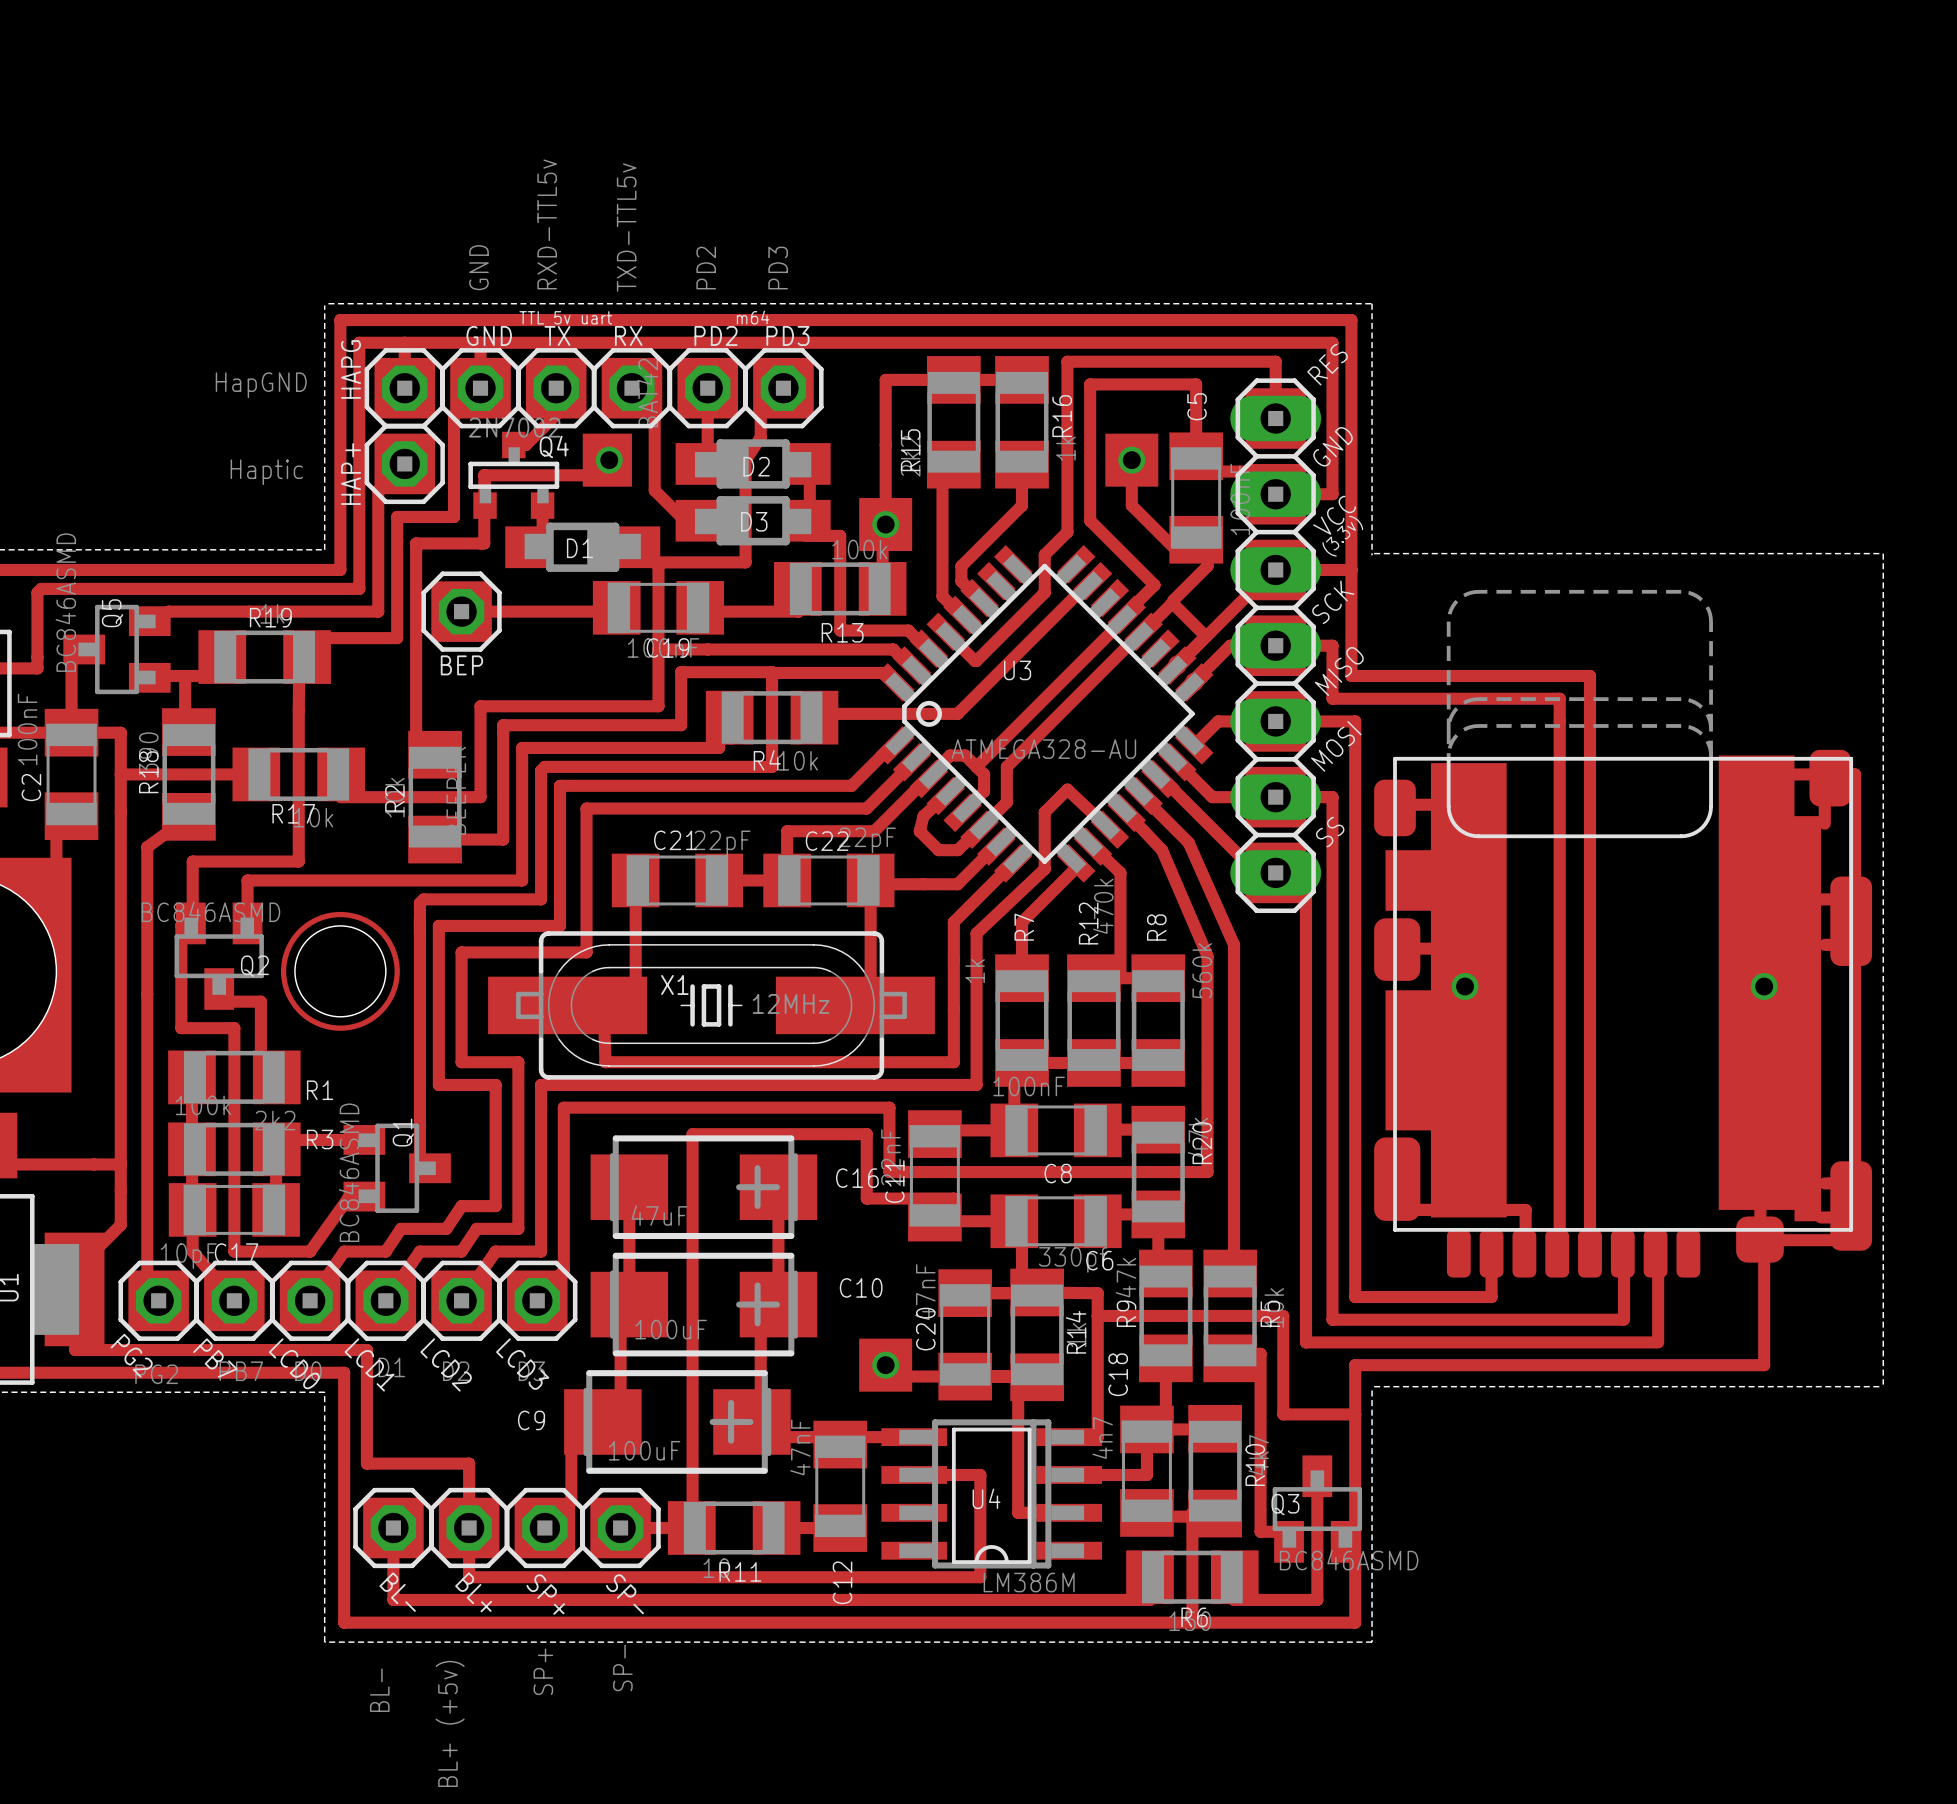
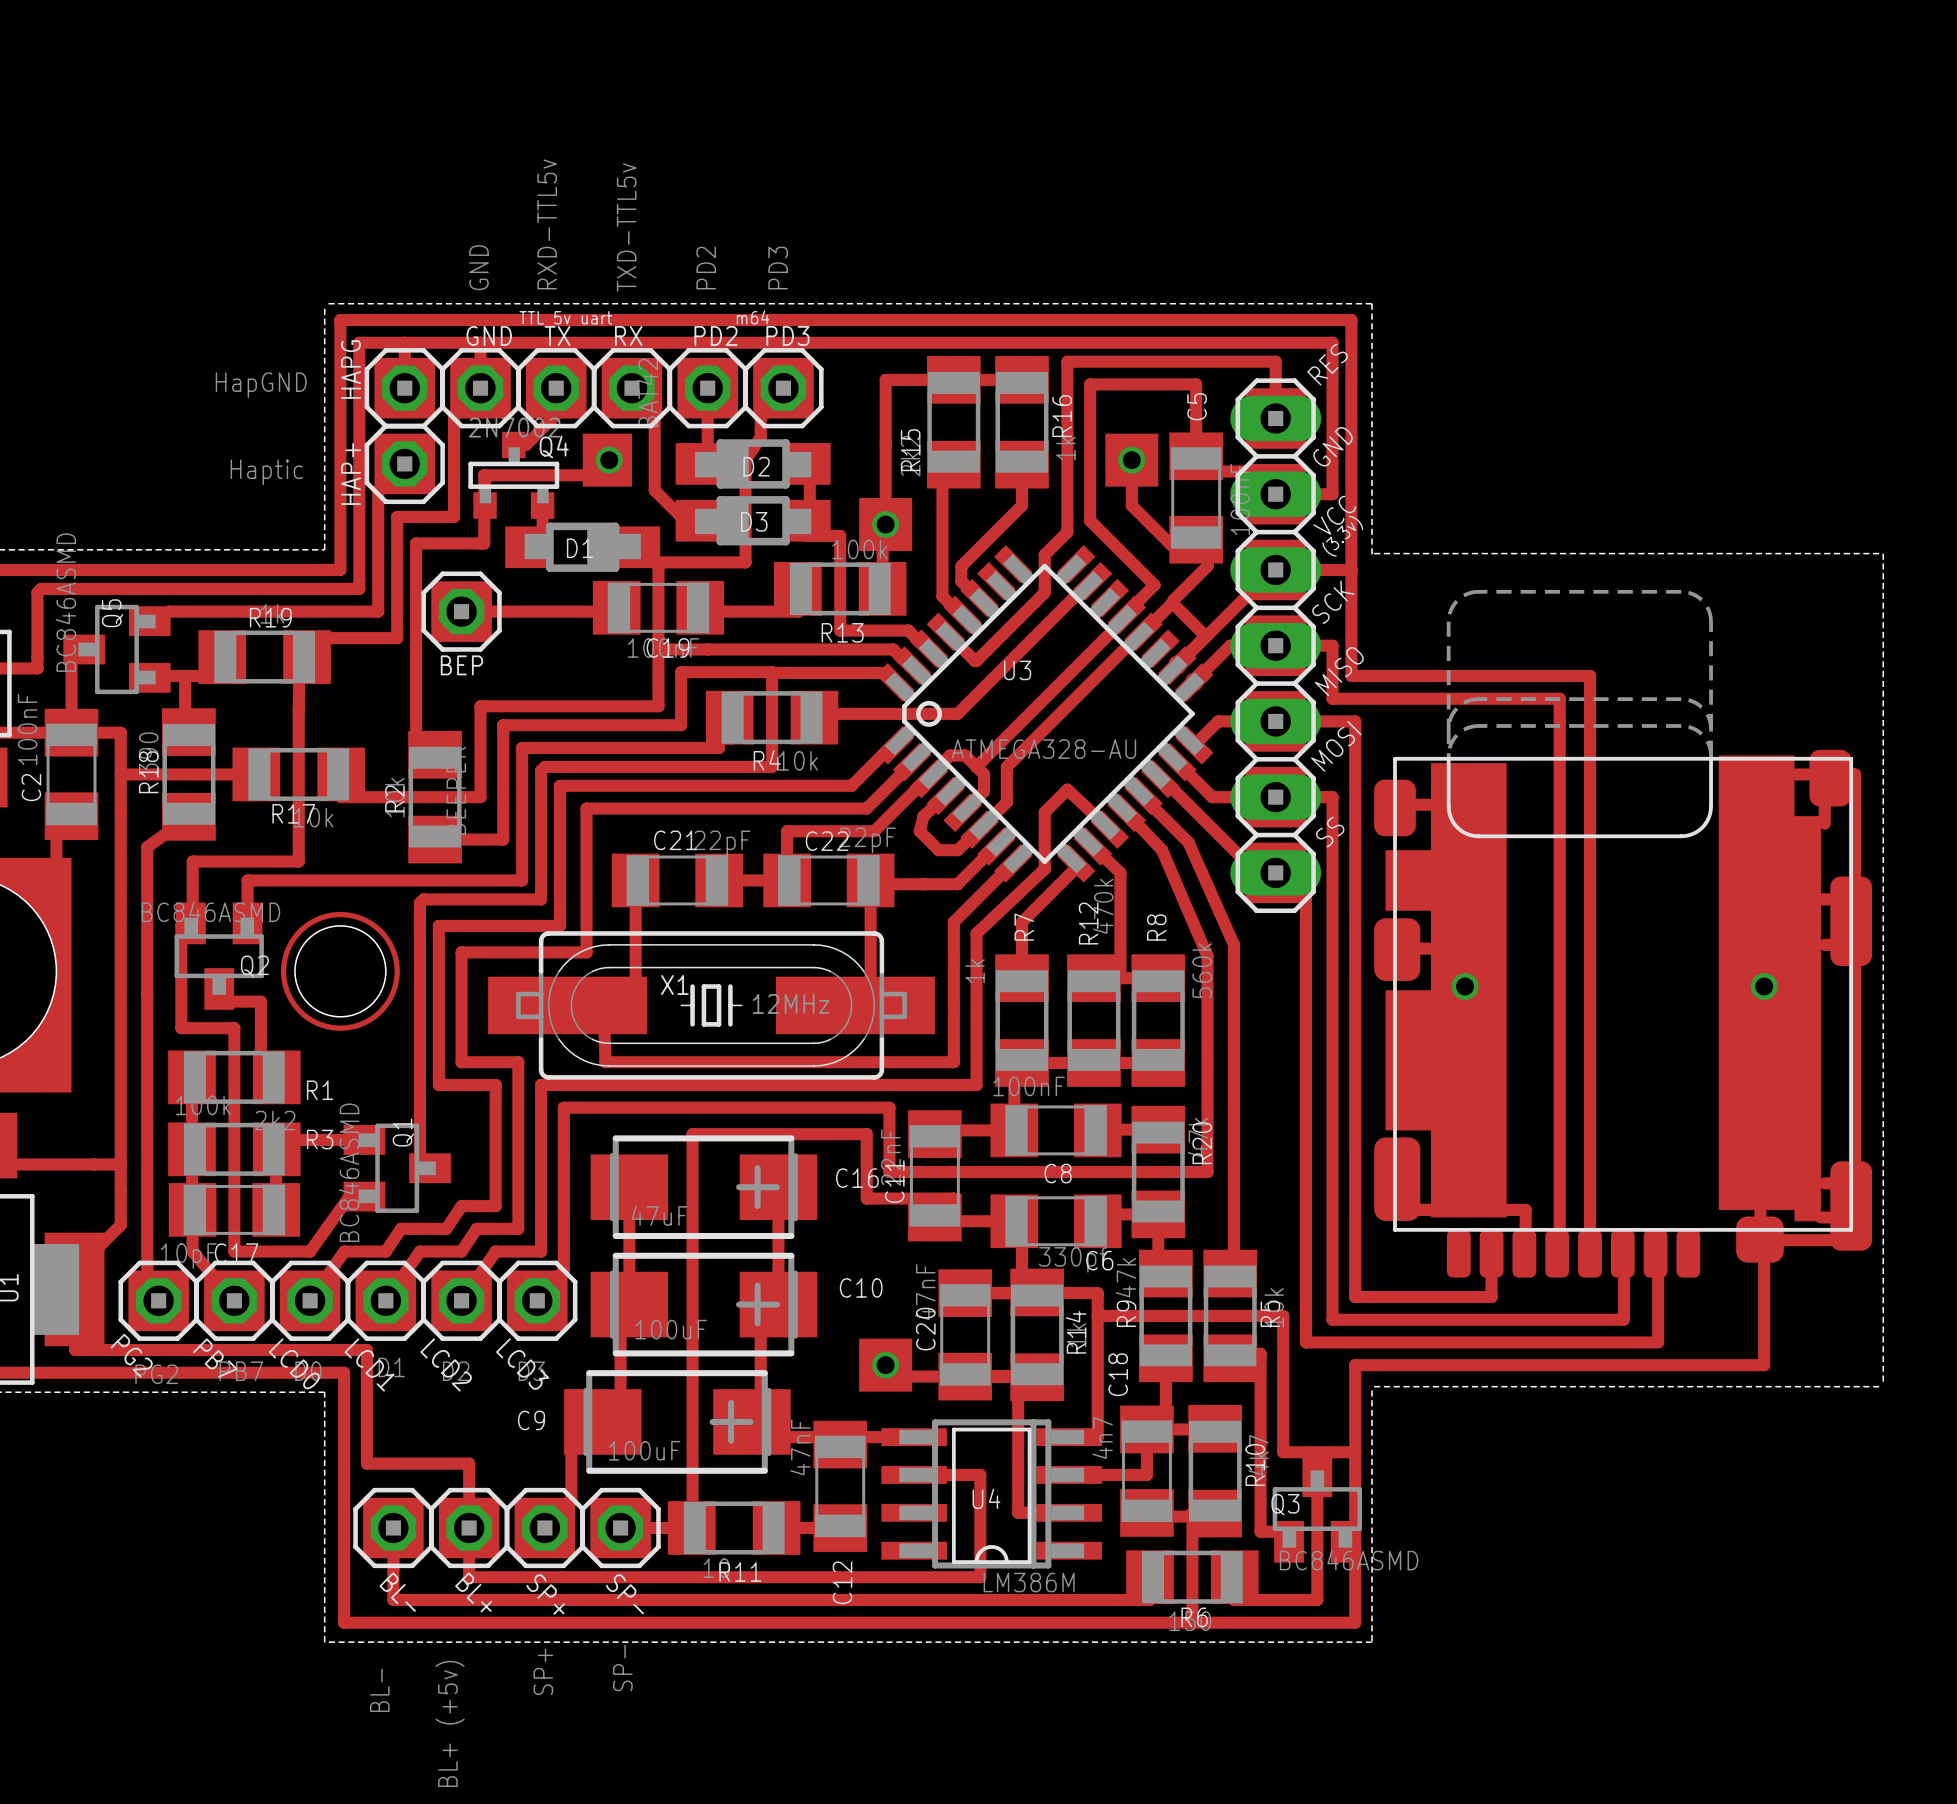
track: (1283, 1414) (1355, 1414) -> (1283, 1414) (1283, 1452) (1355, 1452)

